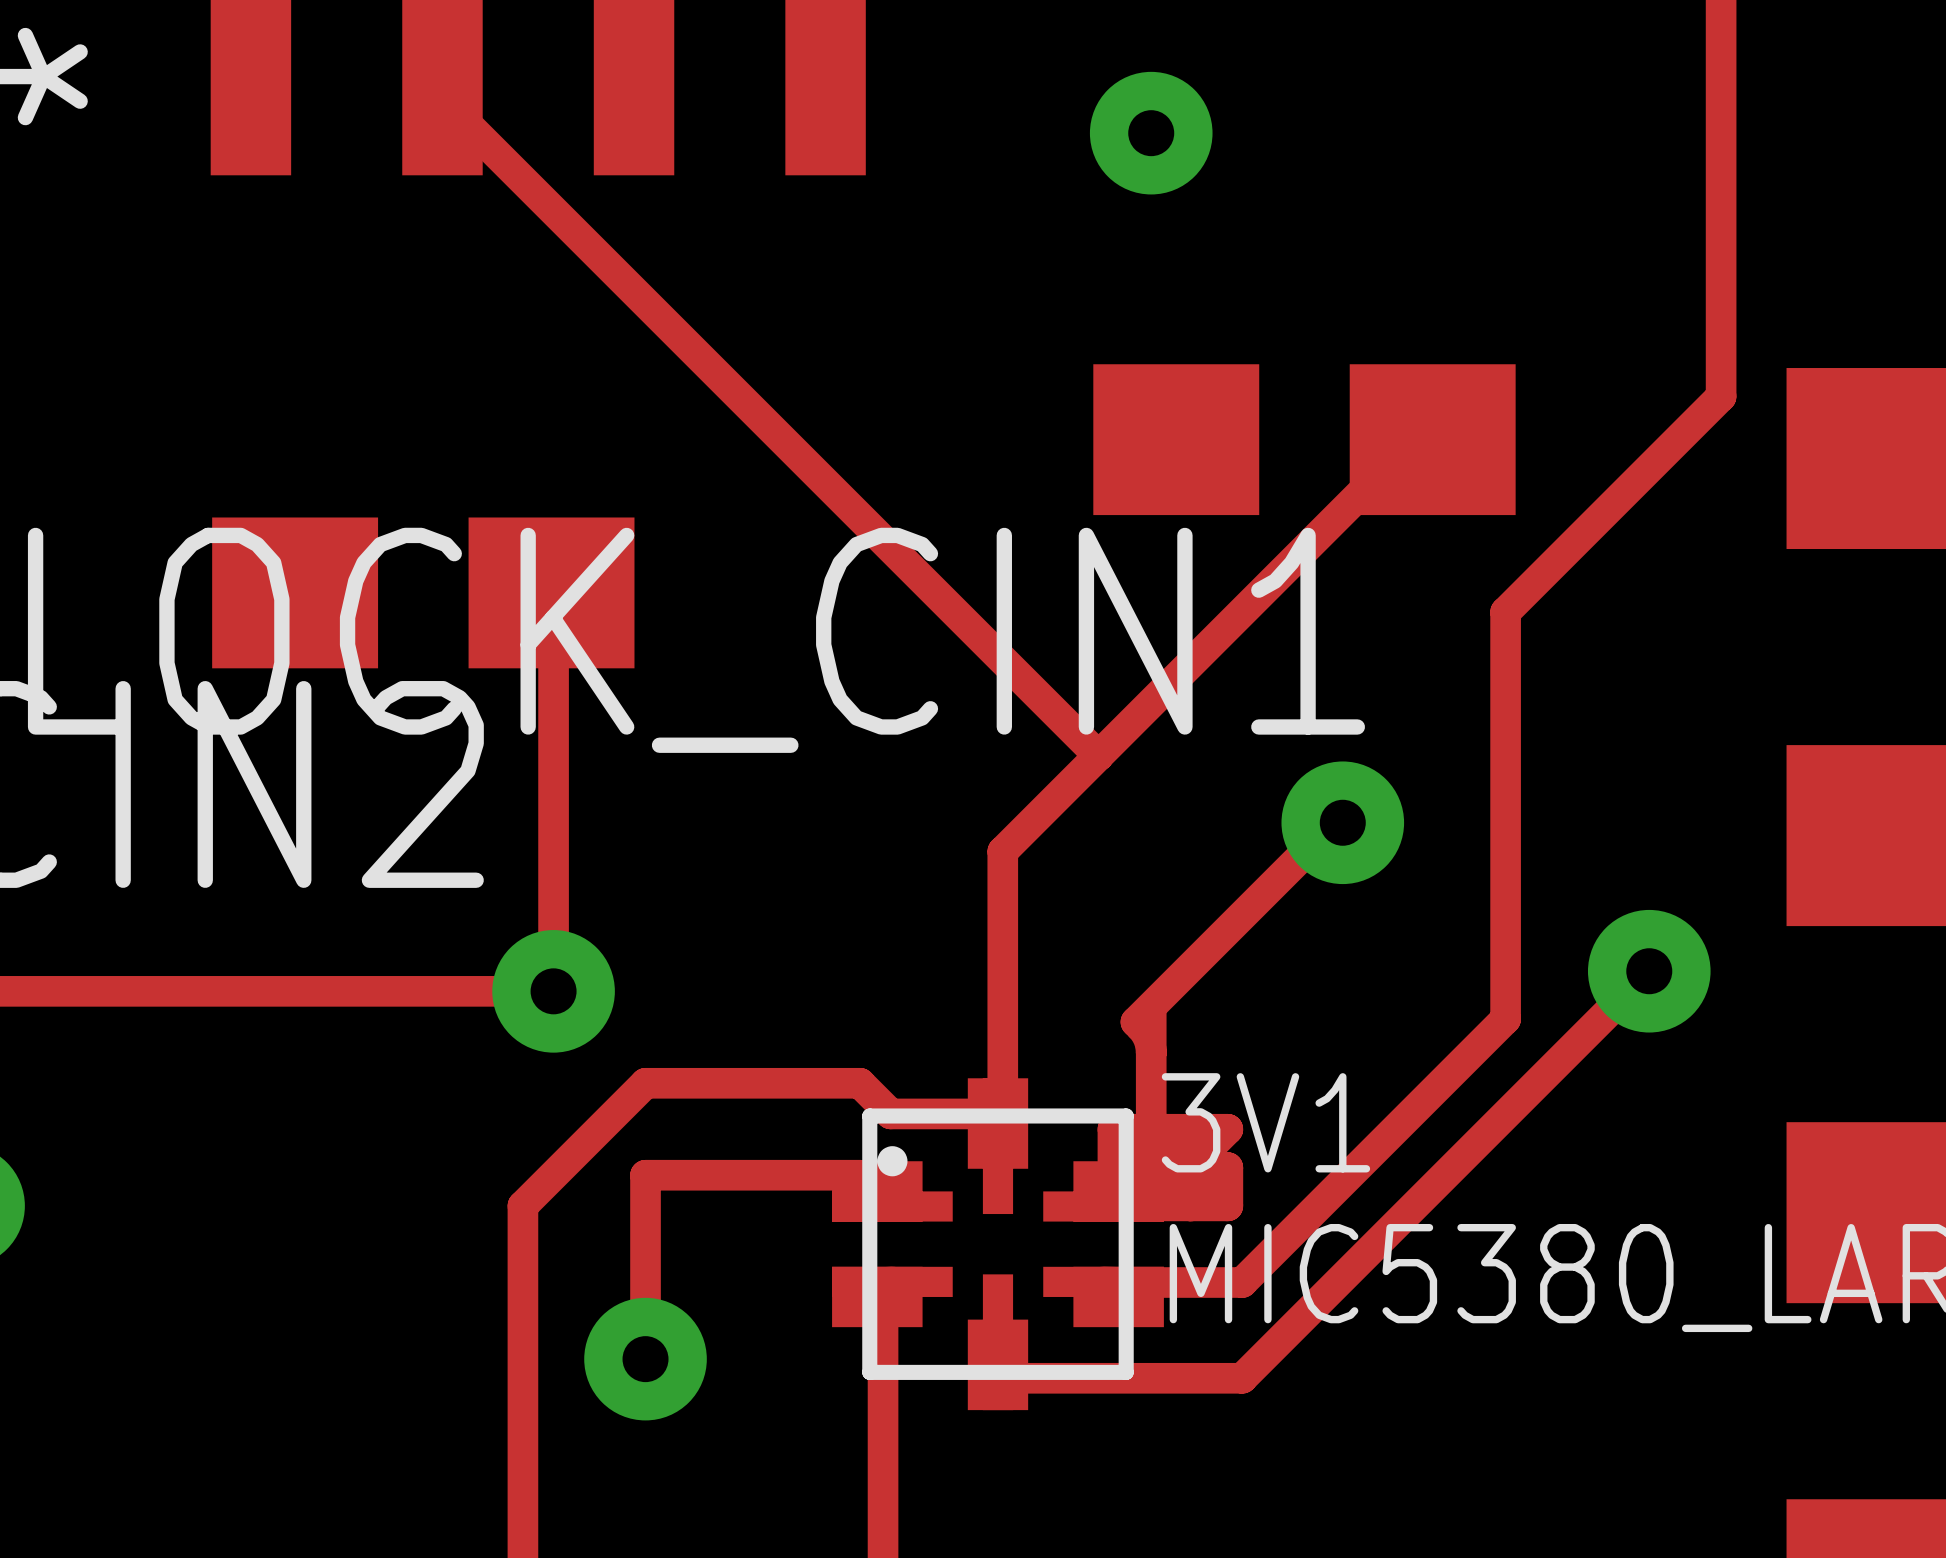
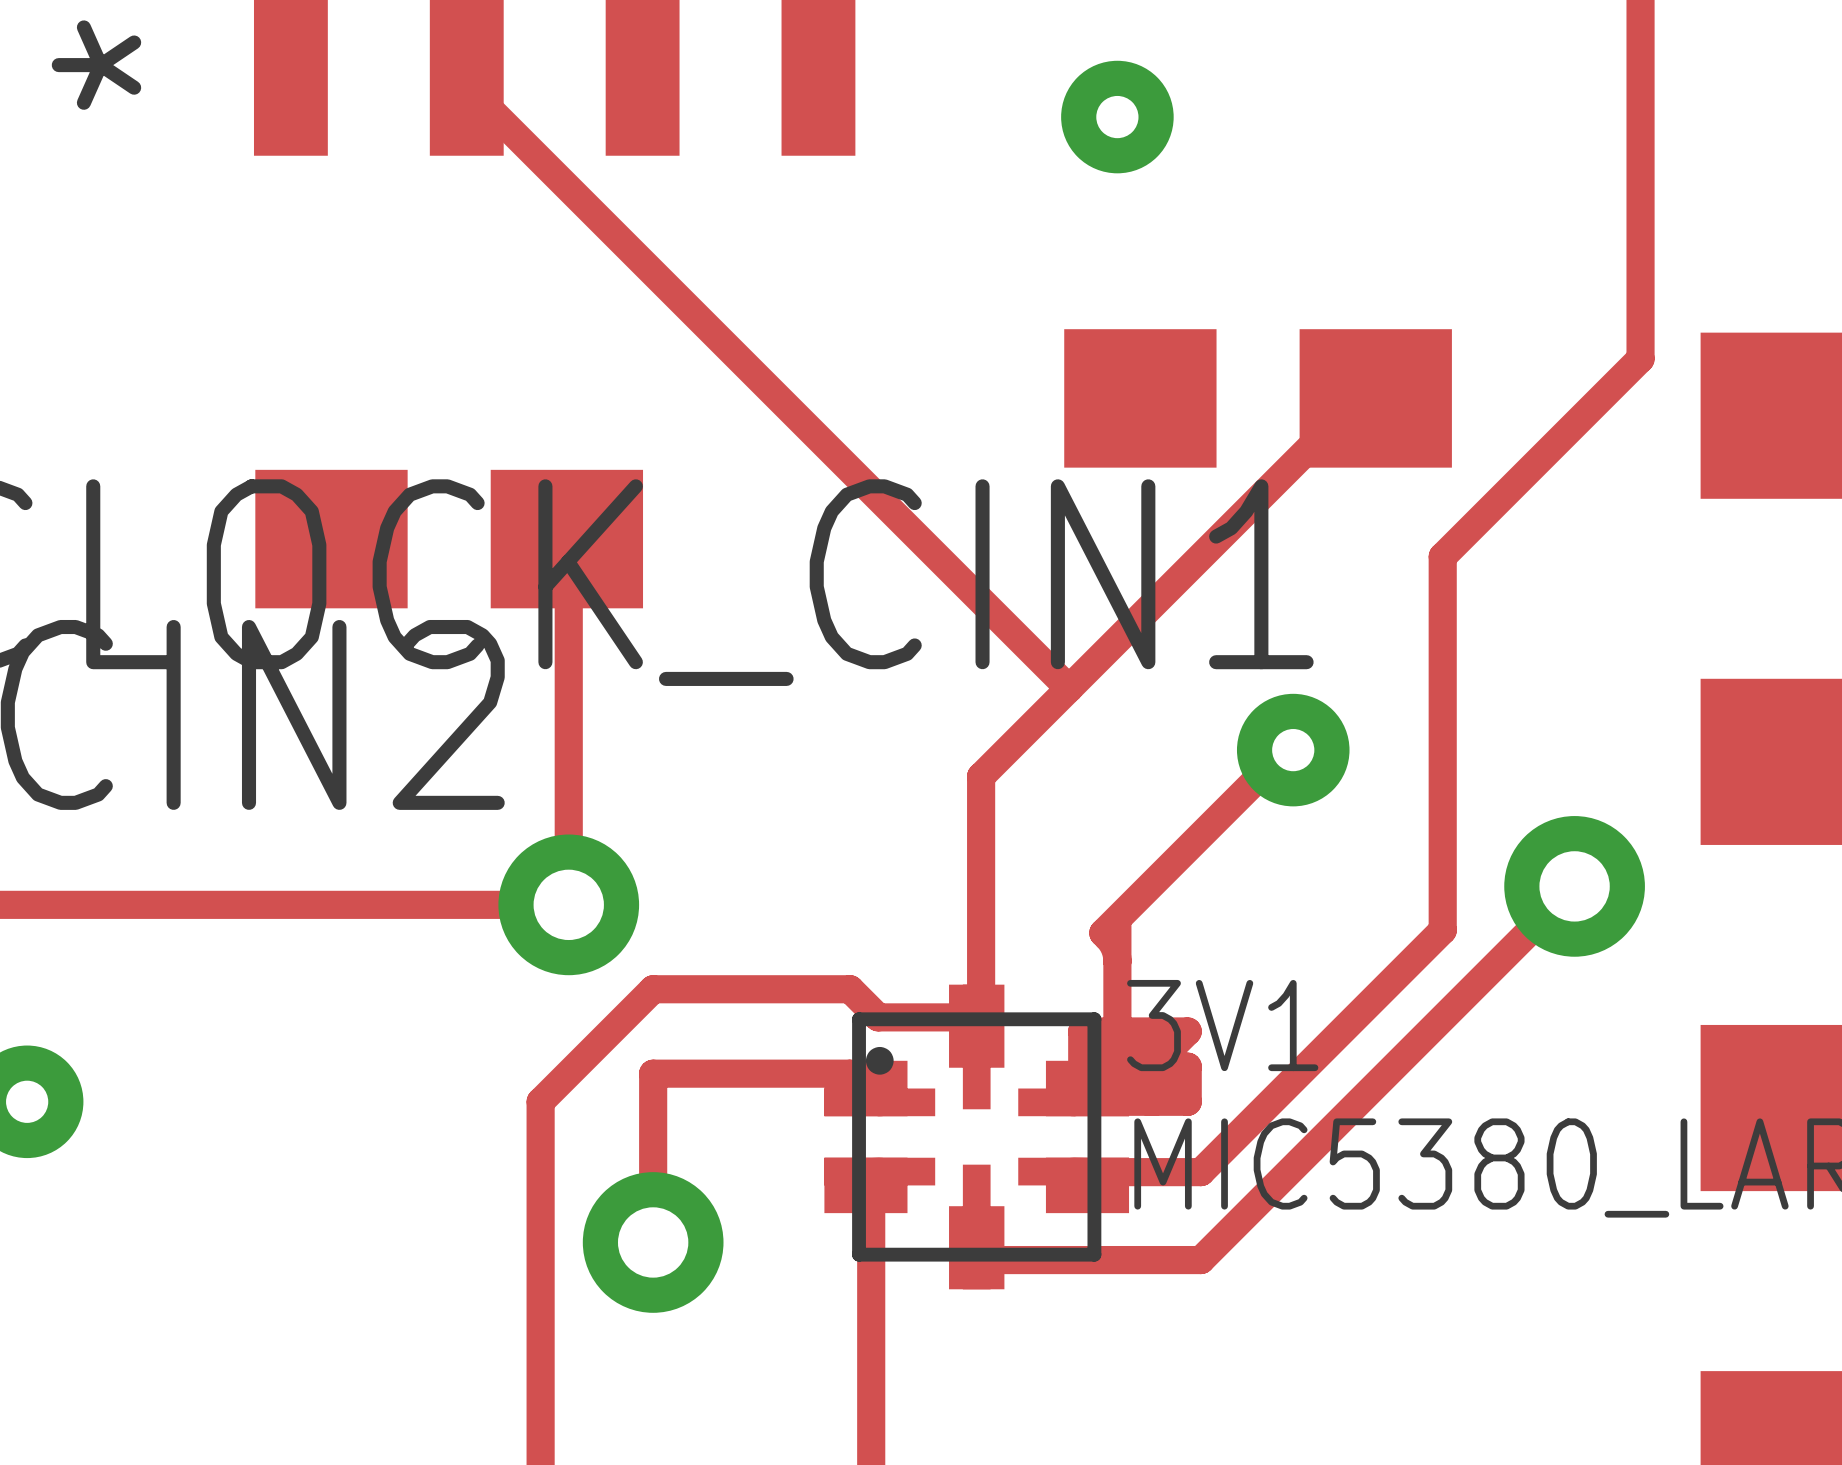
via size: [1587, 909, 1711, 1033] -> [1504, 816, 1645, 957]
via size: [492, 930, 615, 1053] -> [498, 834, 640, 976]
via size: [584, 1297, 707, 1421] -> [582, 1172, 724, 1313]

